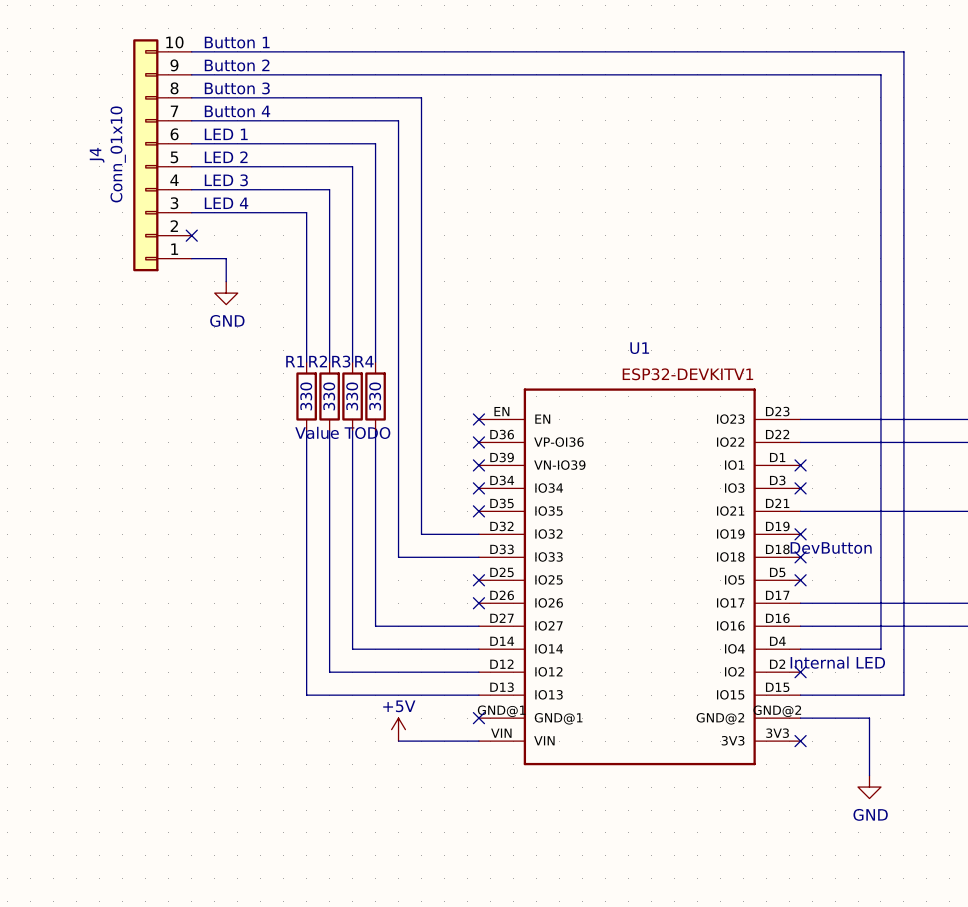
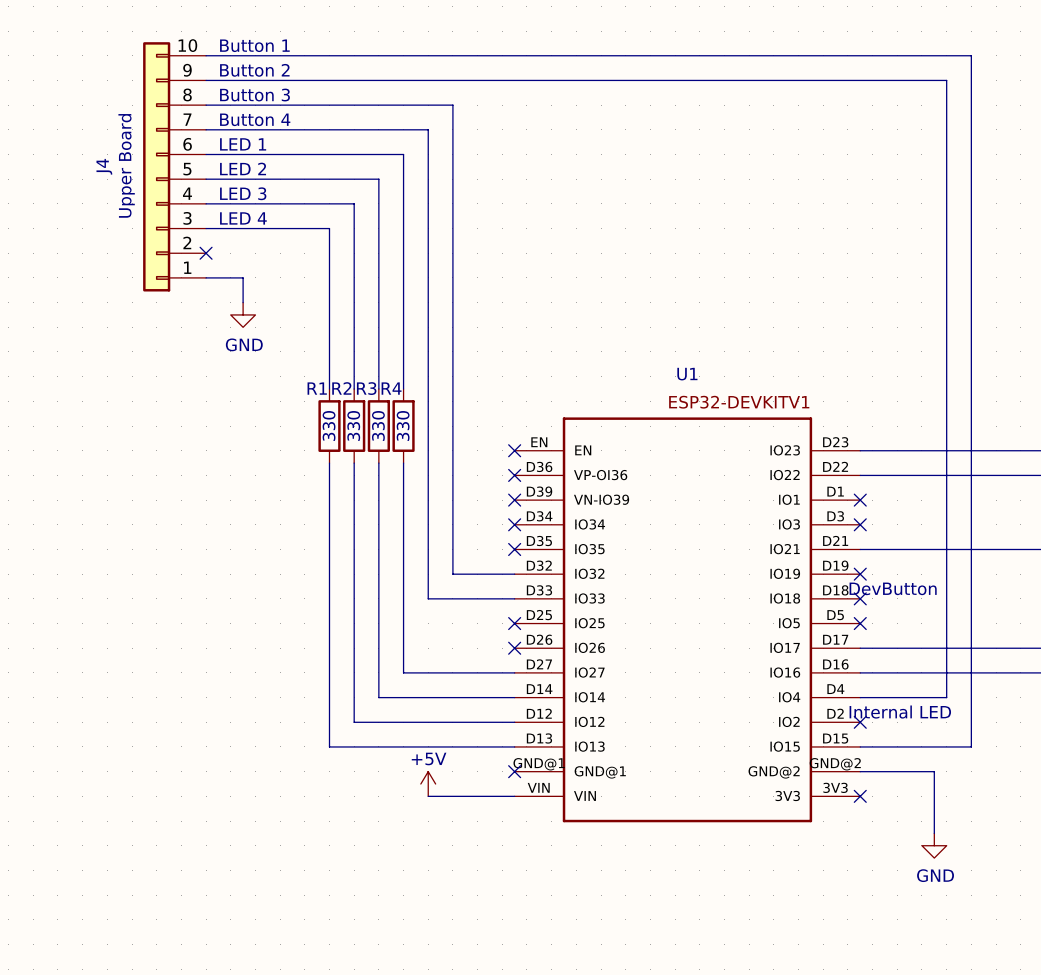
J4 value: Conn_01x10 (118, 154) -> Upper Board (126, 165)
text: Value TODO (342, 432) -> none

